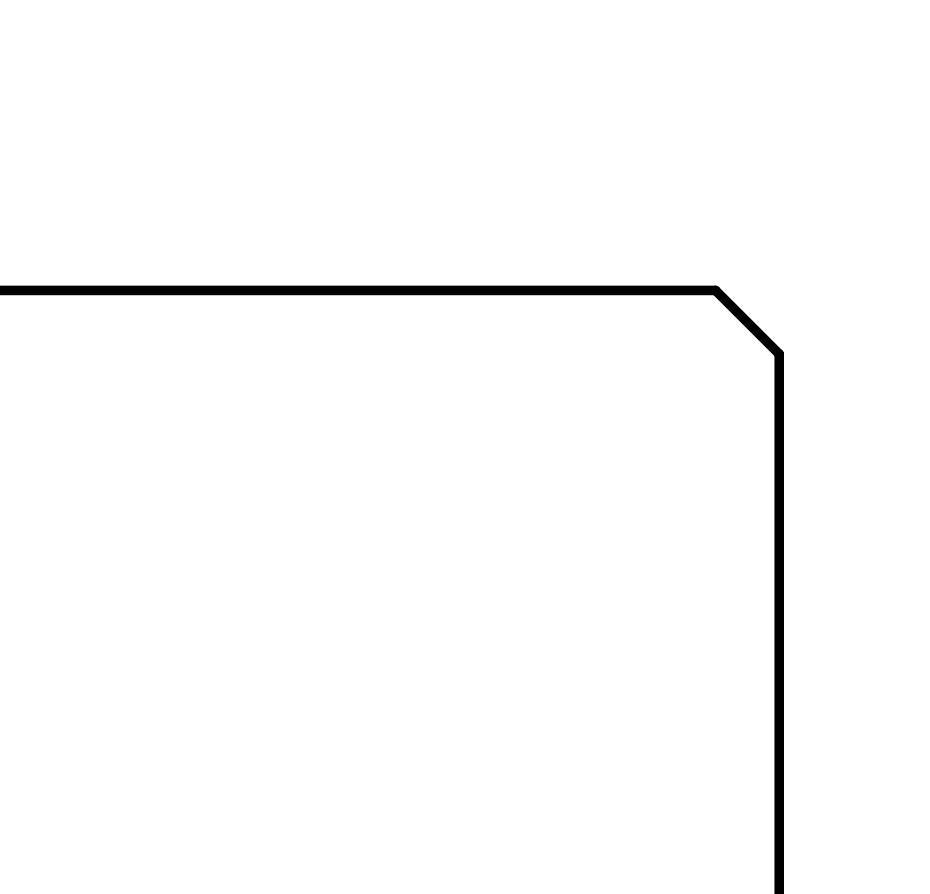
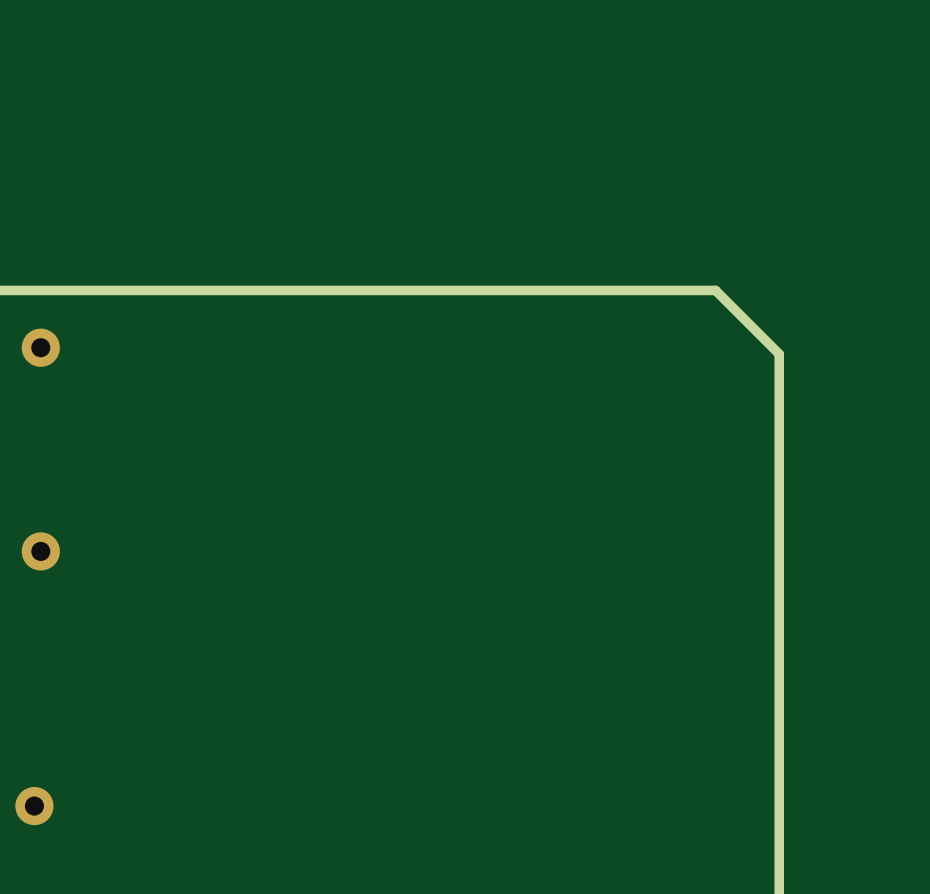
via: none -> (40, 347)
via: none -> (40, 551)
via: none -> (34, 806)

